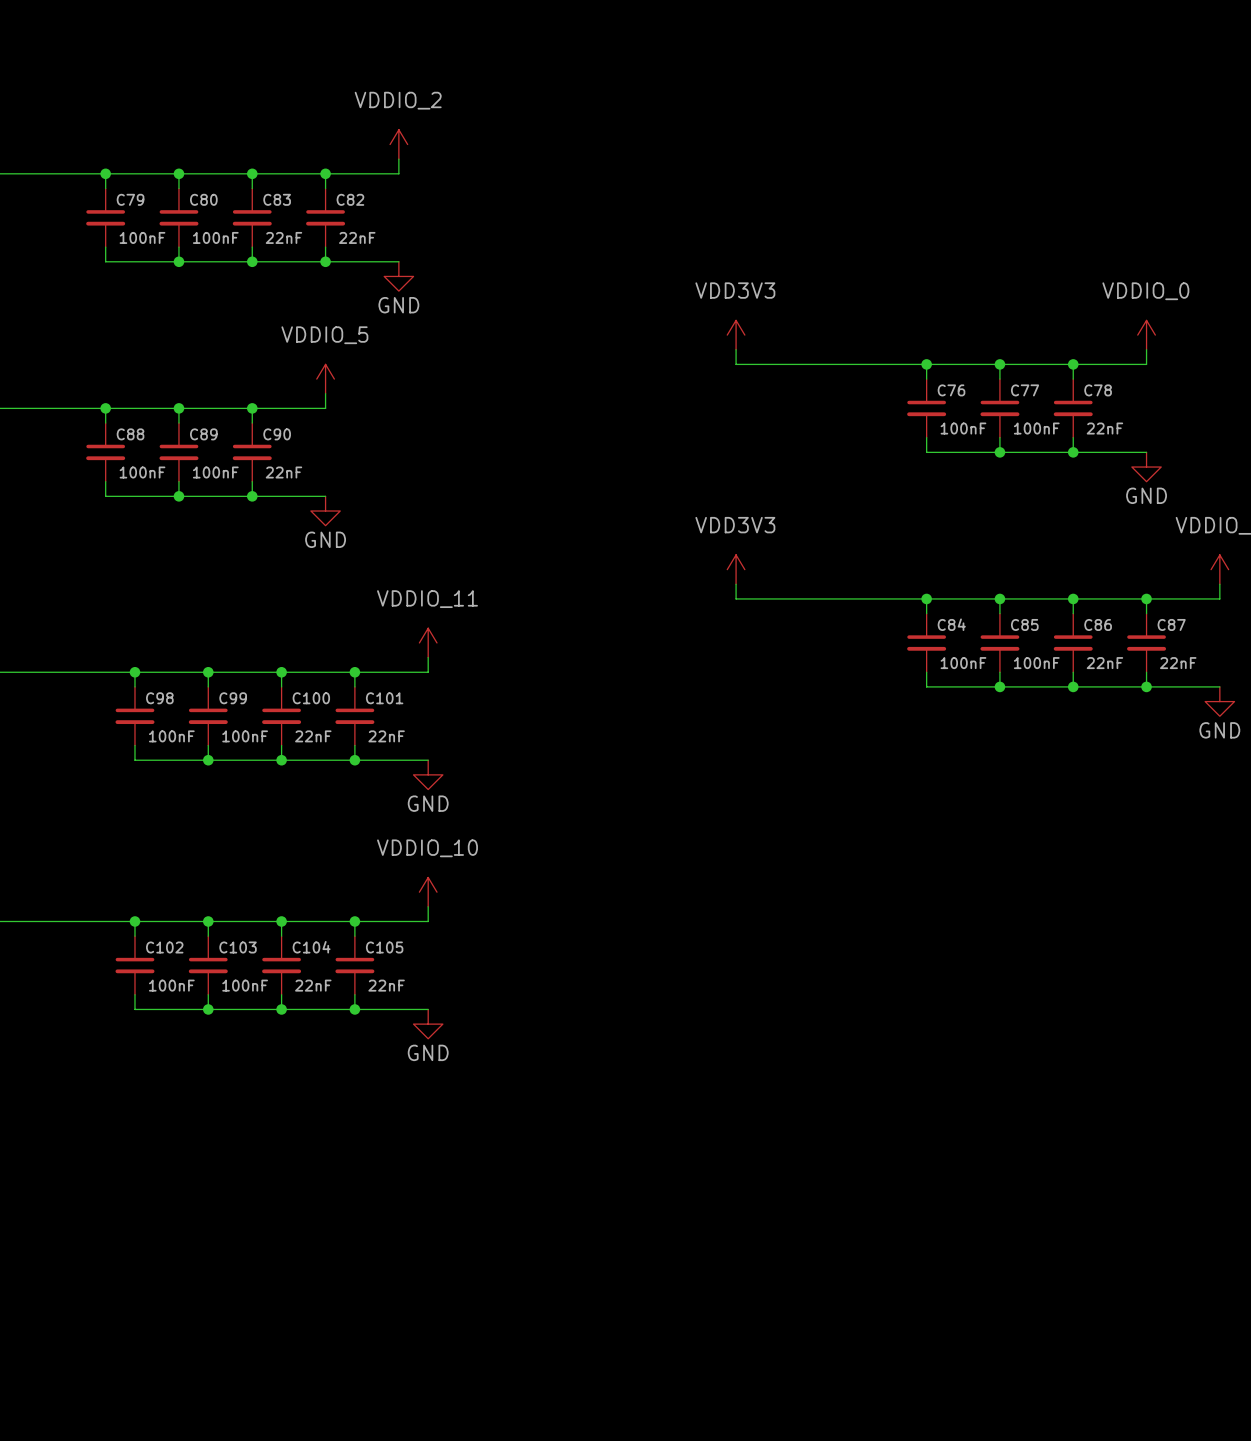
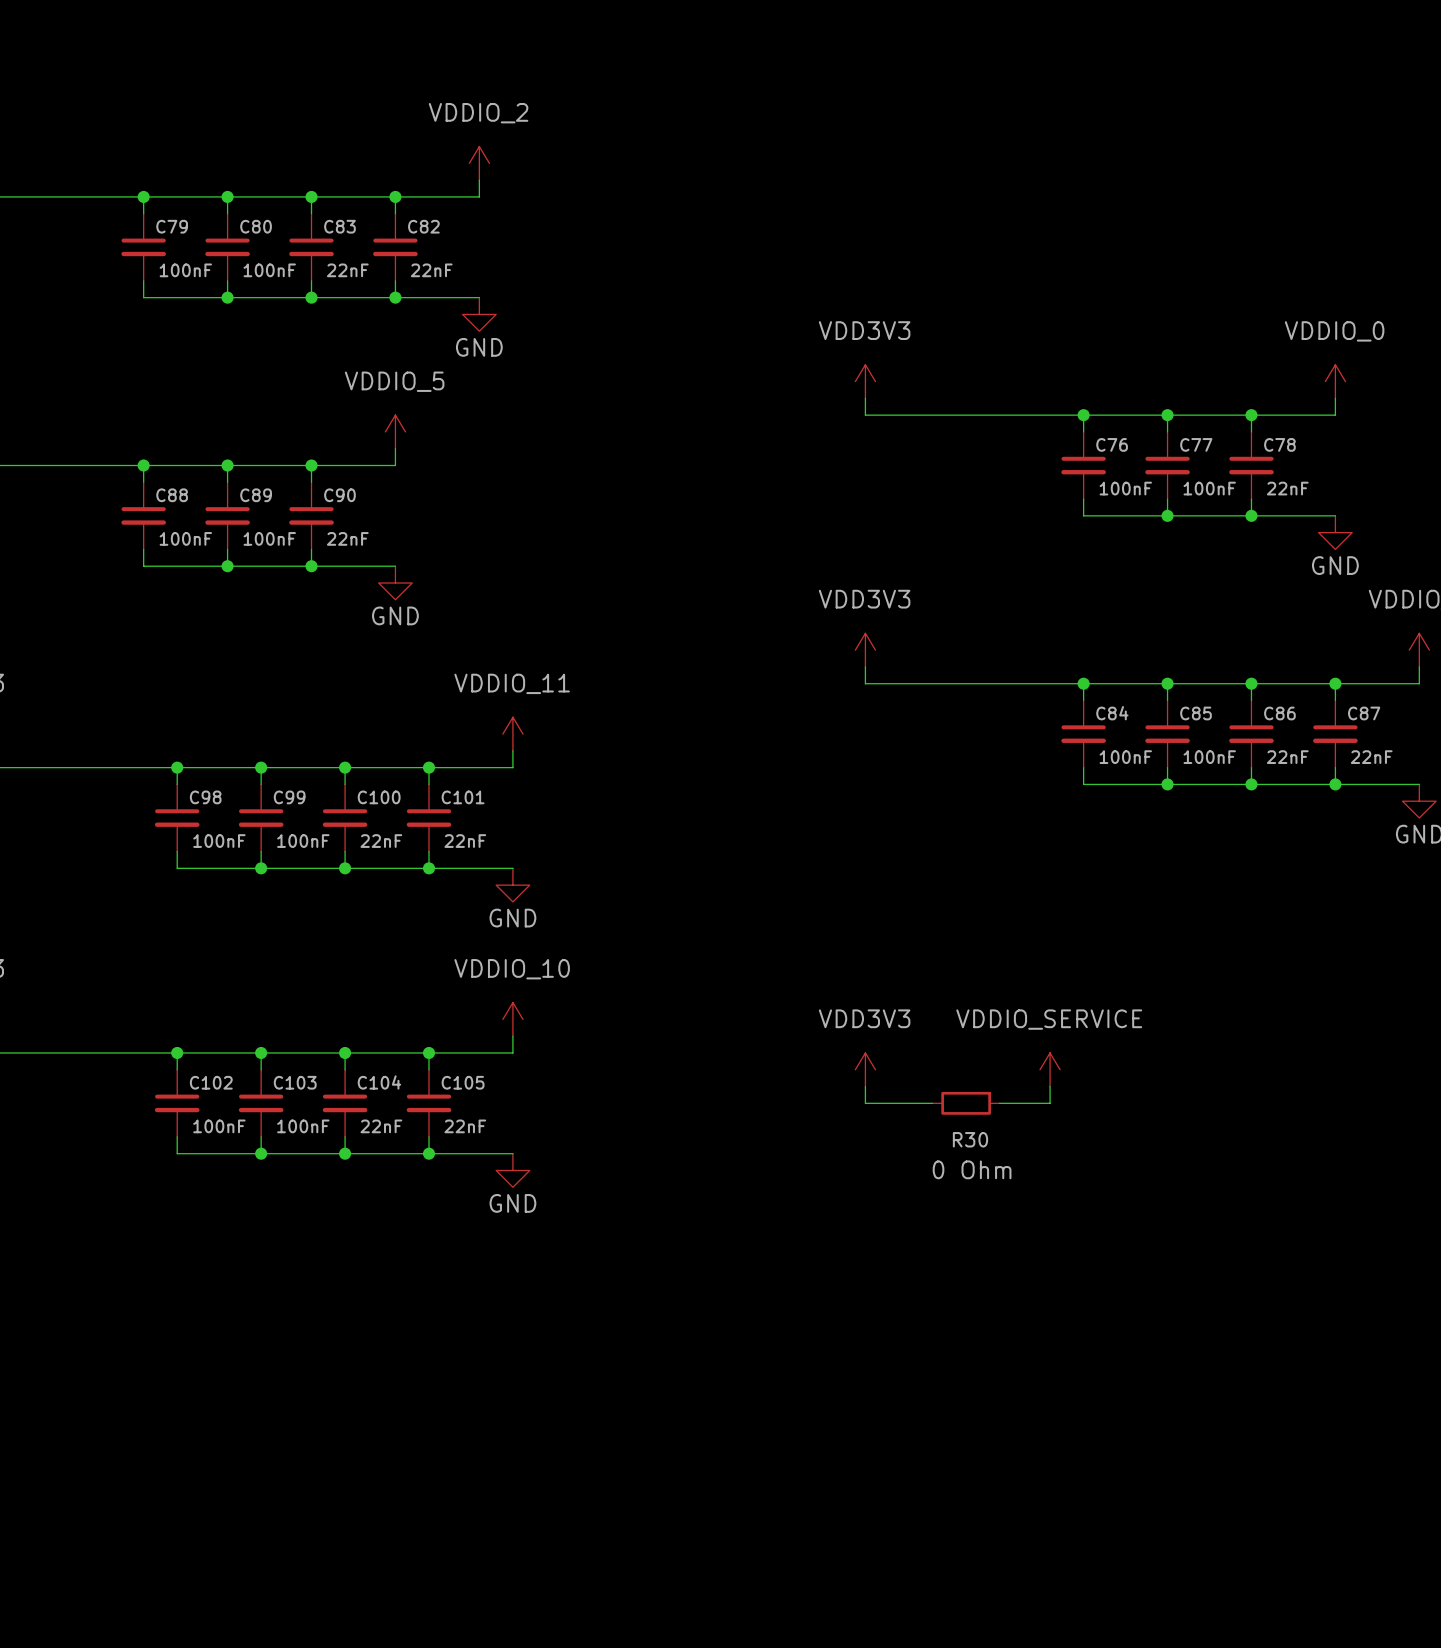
power symbol: none -> VDD3V3 (865, 1069)
power symbol: none -> VDDIO_SERVICE (1050, 1069)
wire: none -> (865, 1086) (865, 1103) (932, 1103)
wire: none -> (1050, 1086) (1050, 1103) (999, 1103)
R30: none -> 0 Ohm (966, 1103)

